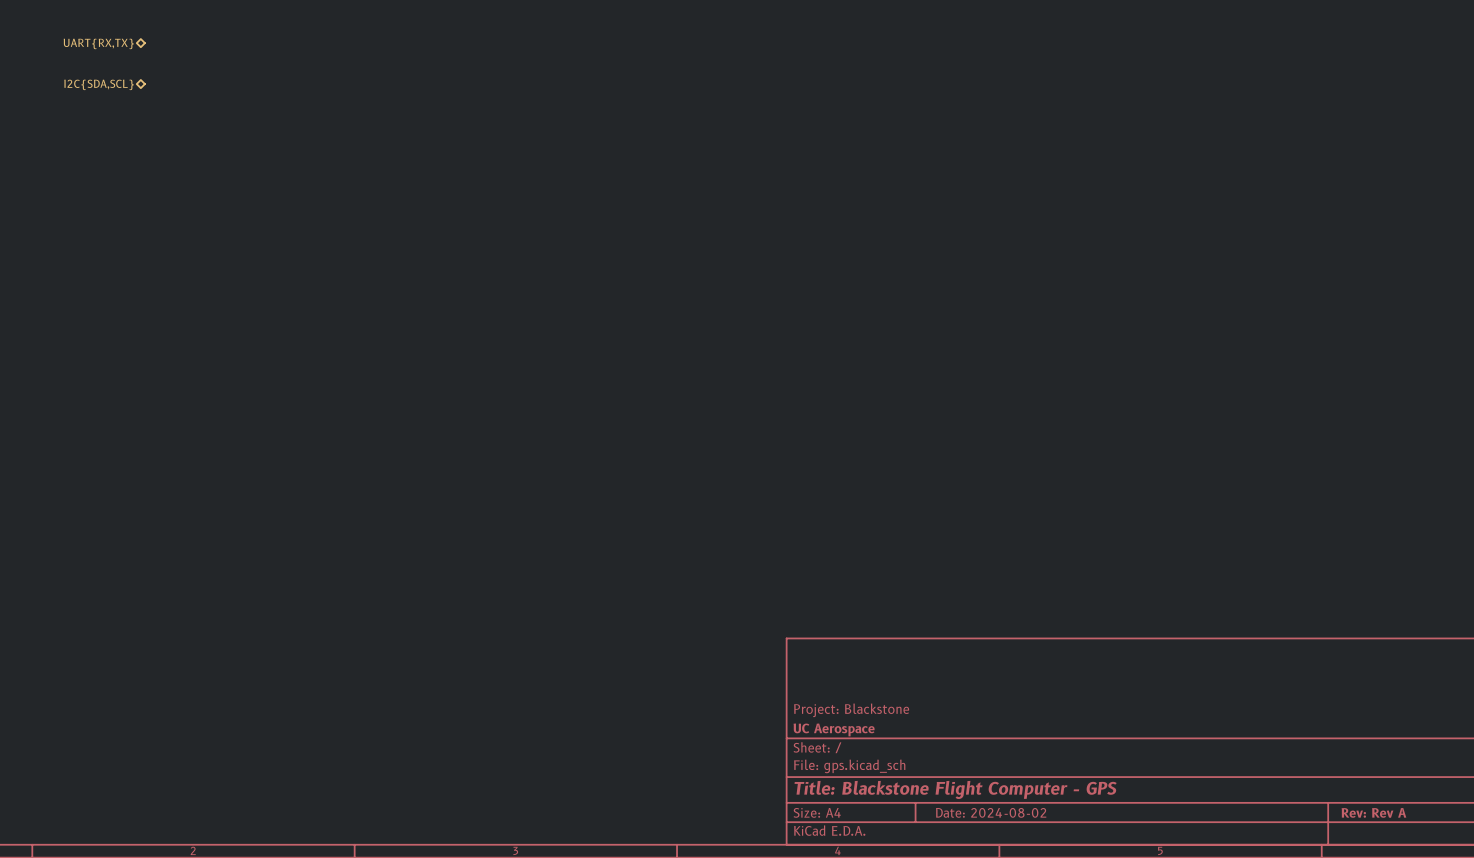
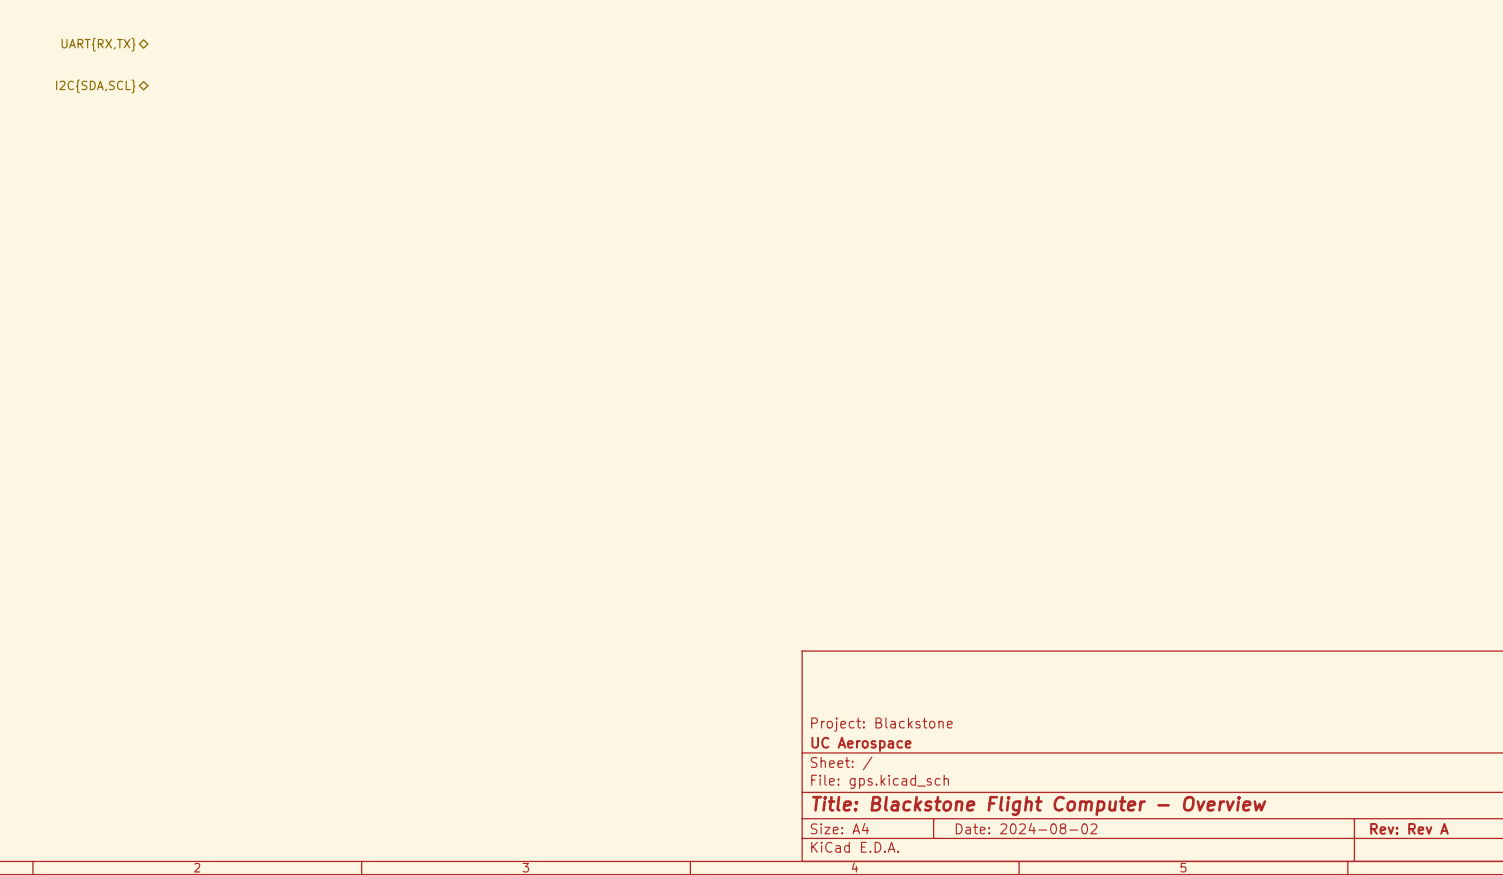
title block: Title: Blackstone Flight Computer - GPS (955, 789) -> Title: Blackstone Flight Computer - Overview (1039, 805)

